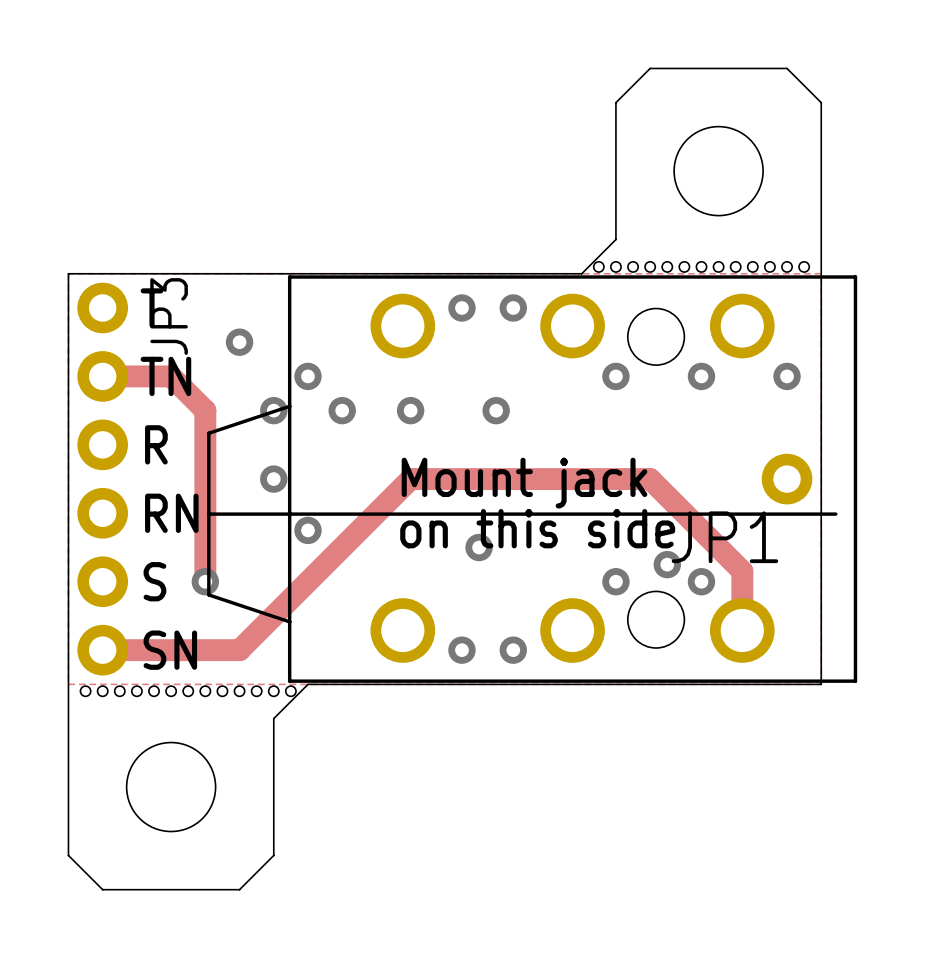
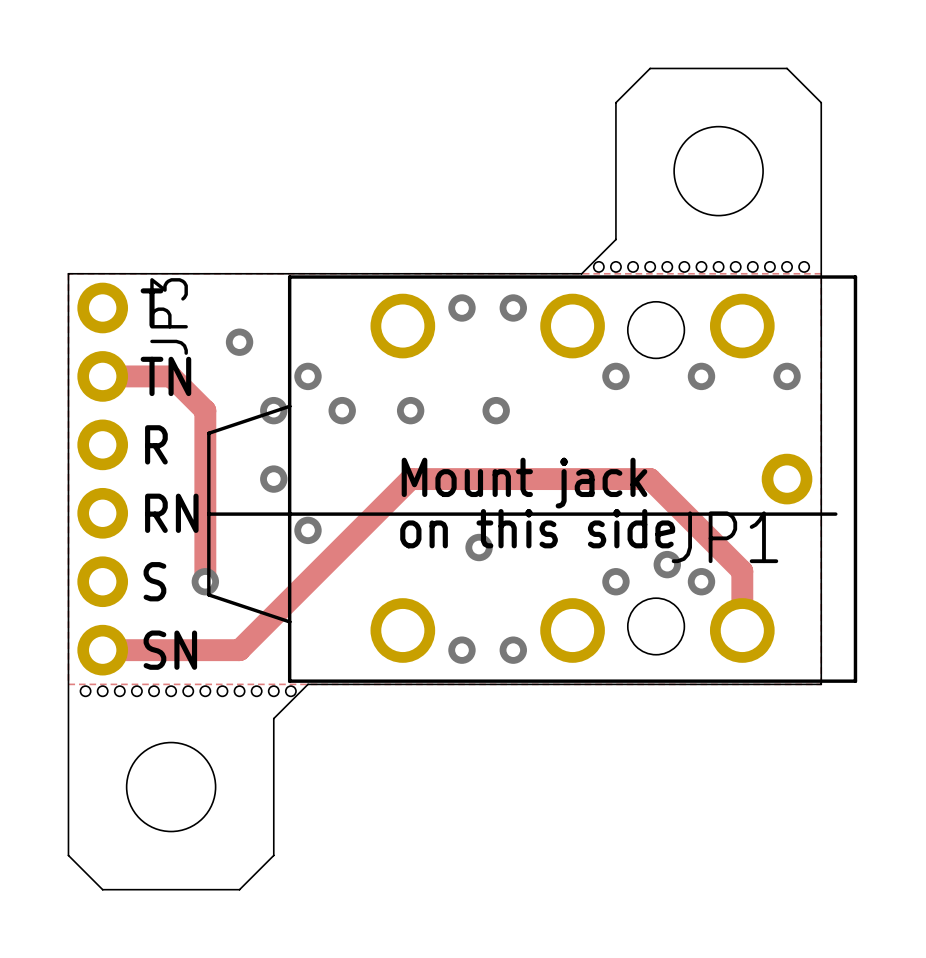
JP1 footprint: [207, 275, 858, 683] -> [207, 275, 858, 683]

